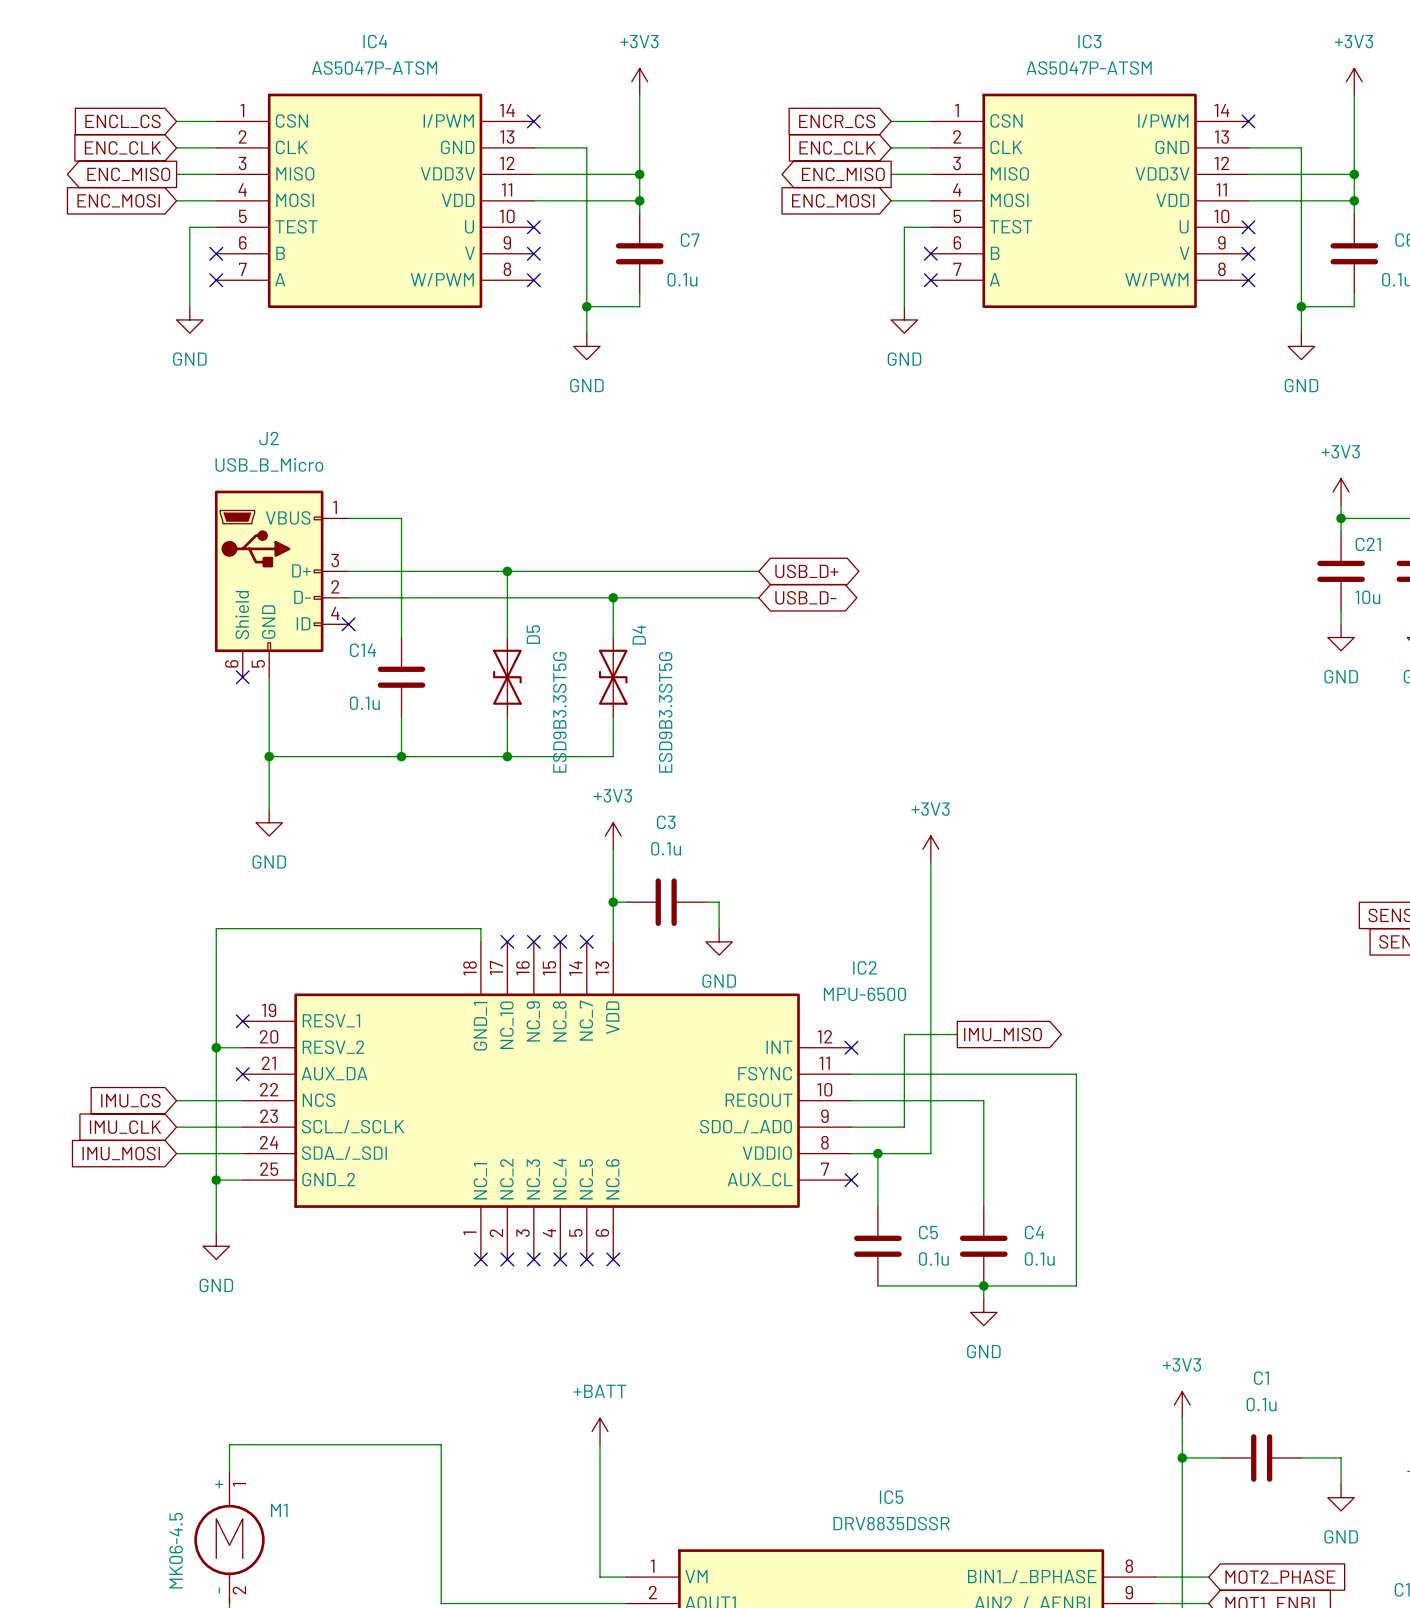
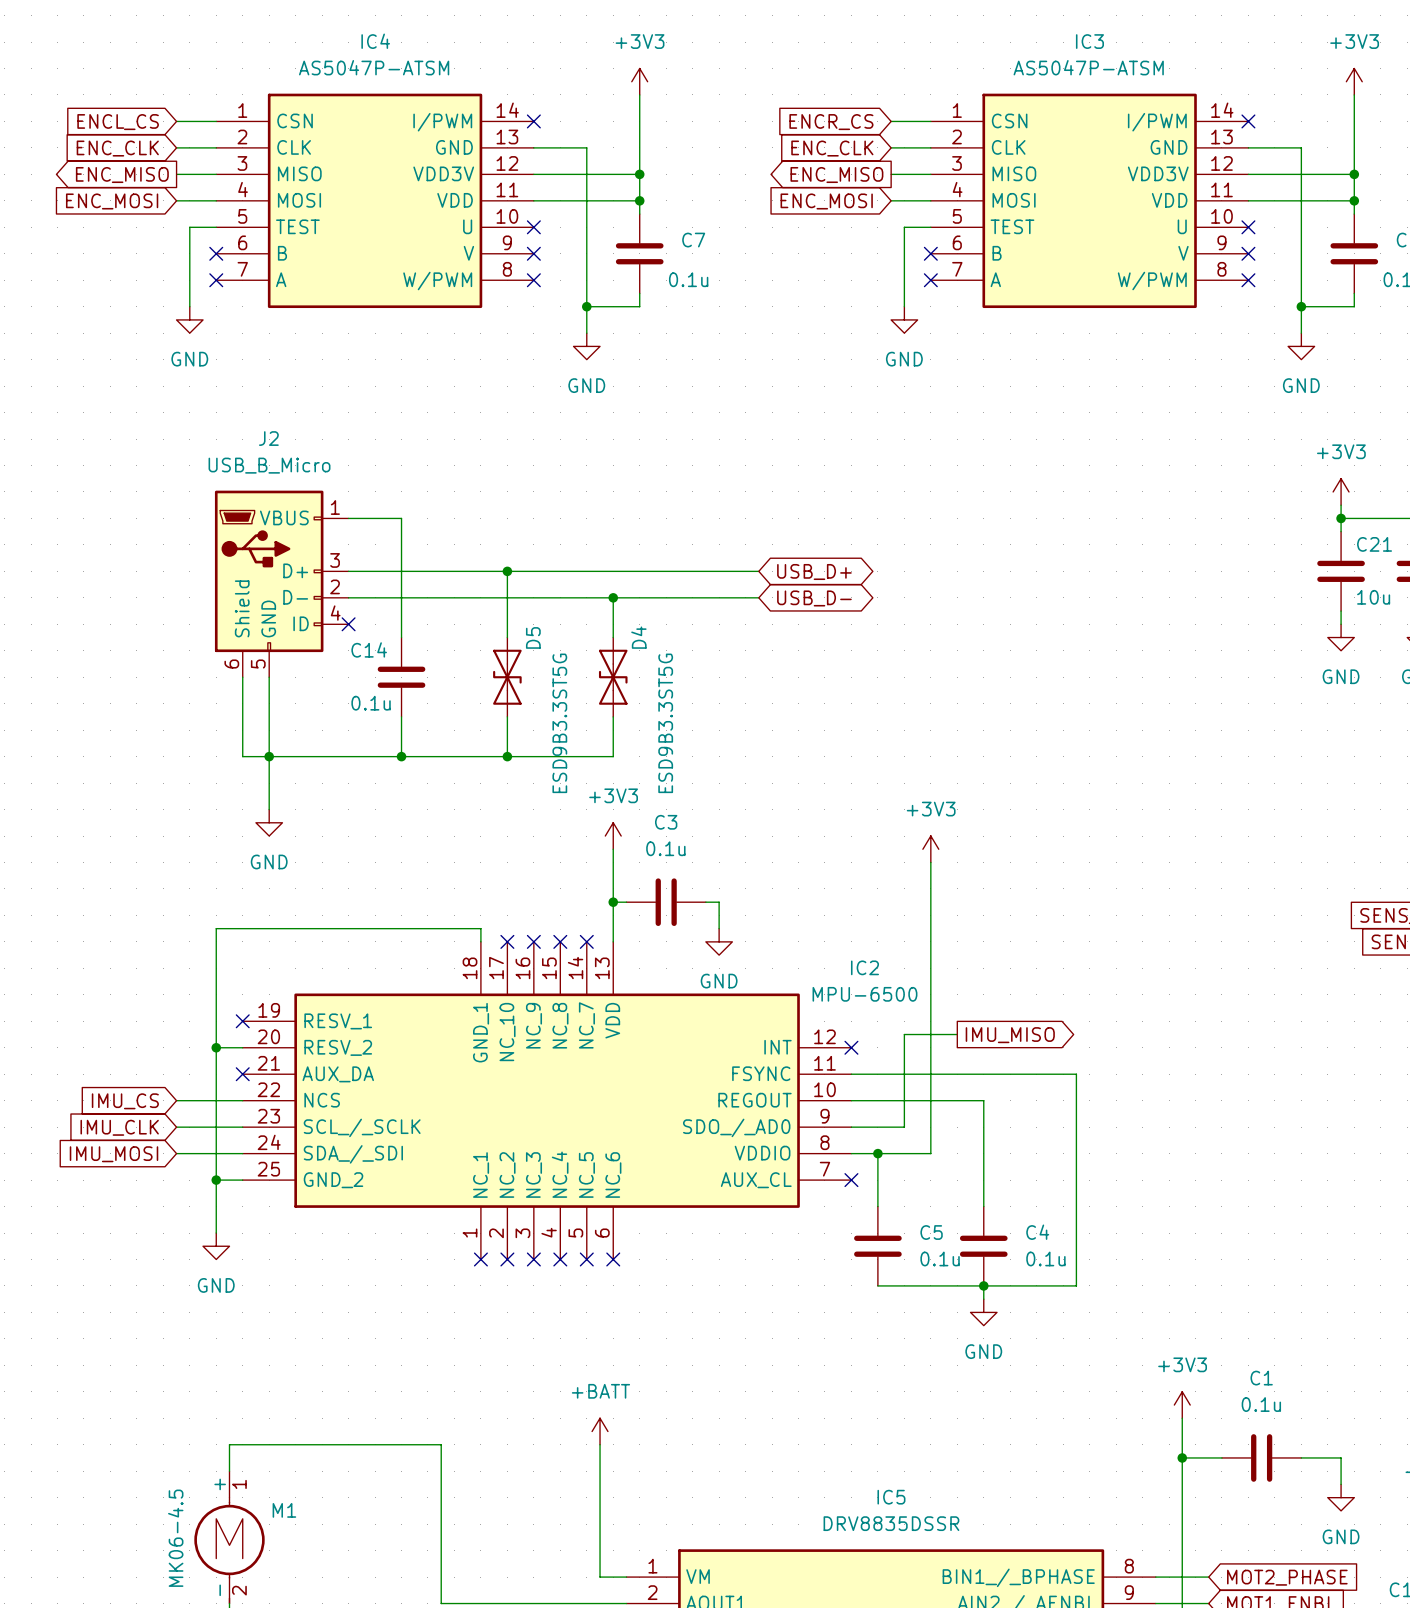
wire: none -> (242, 677) (242, 756) (269, 756)
no-connect mark: (242, 677) -> none

